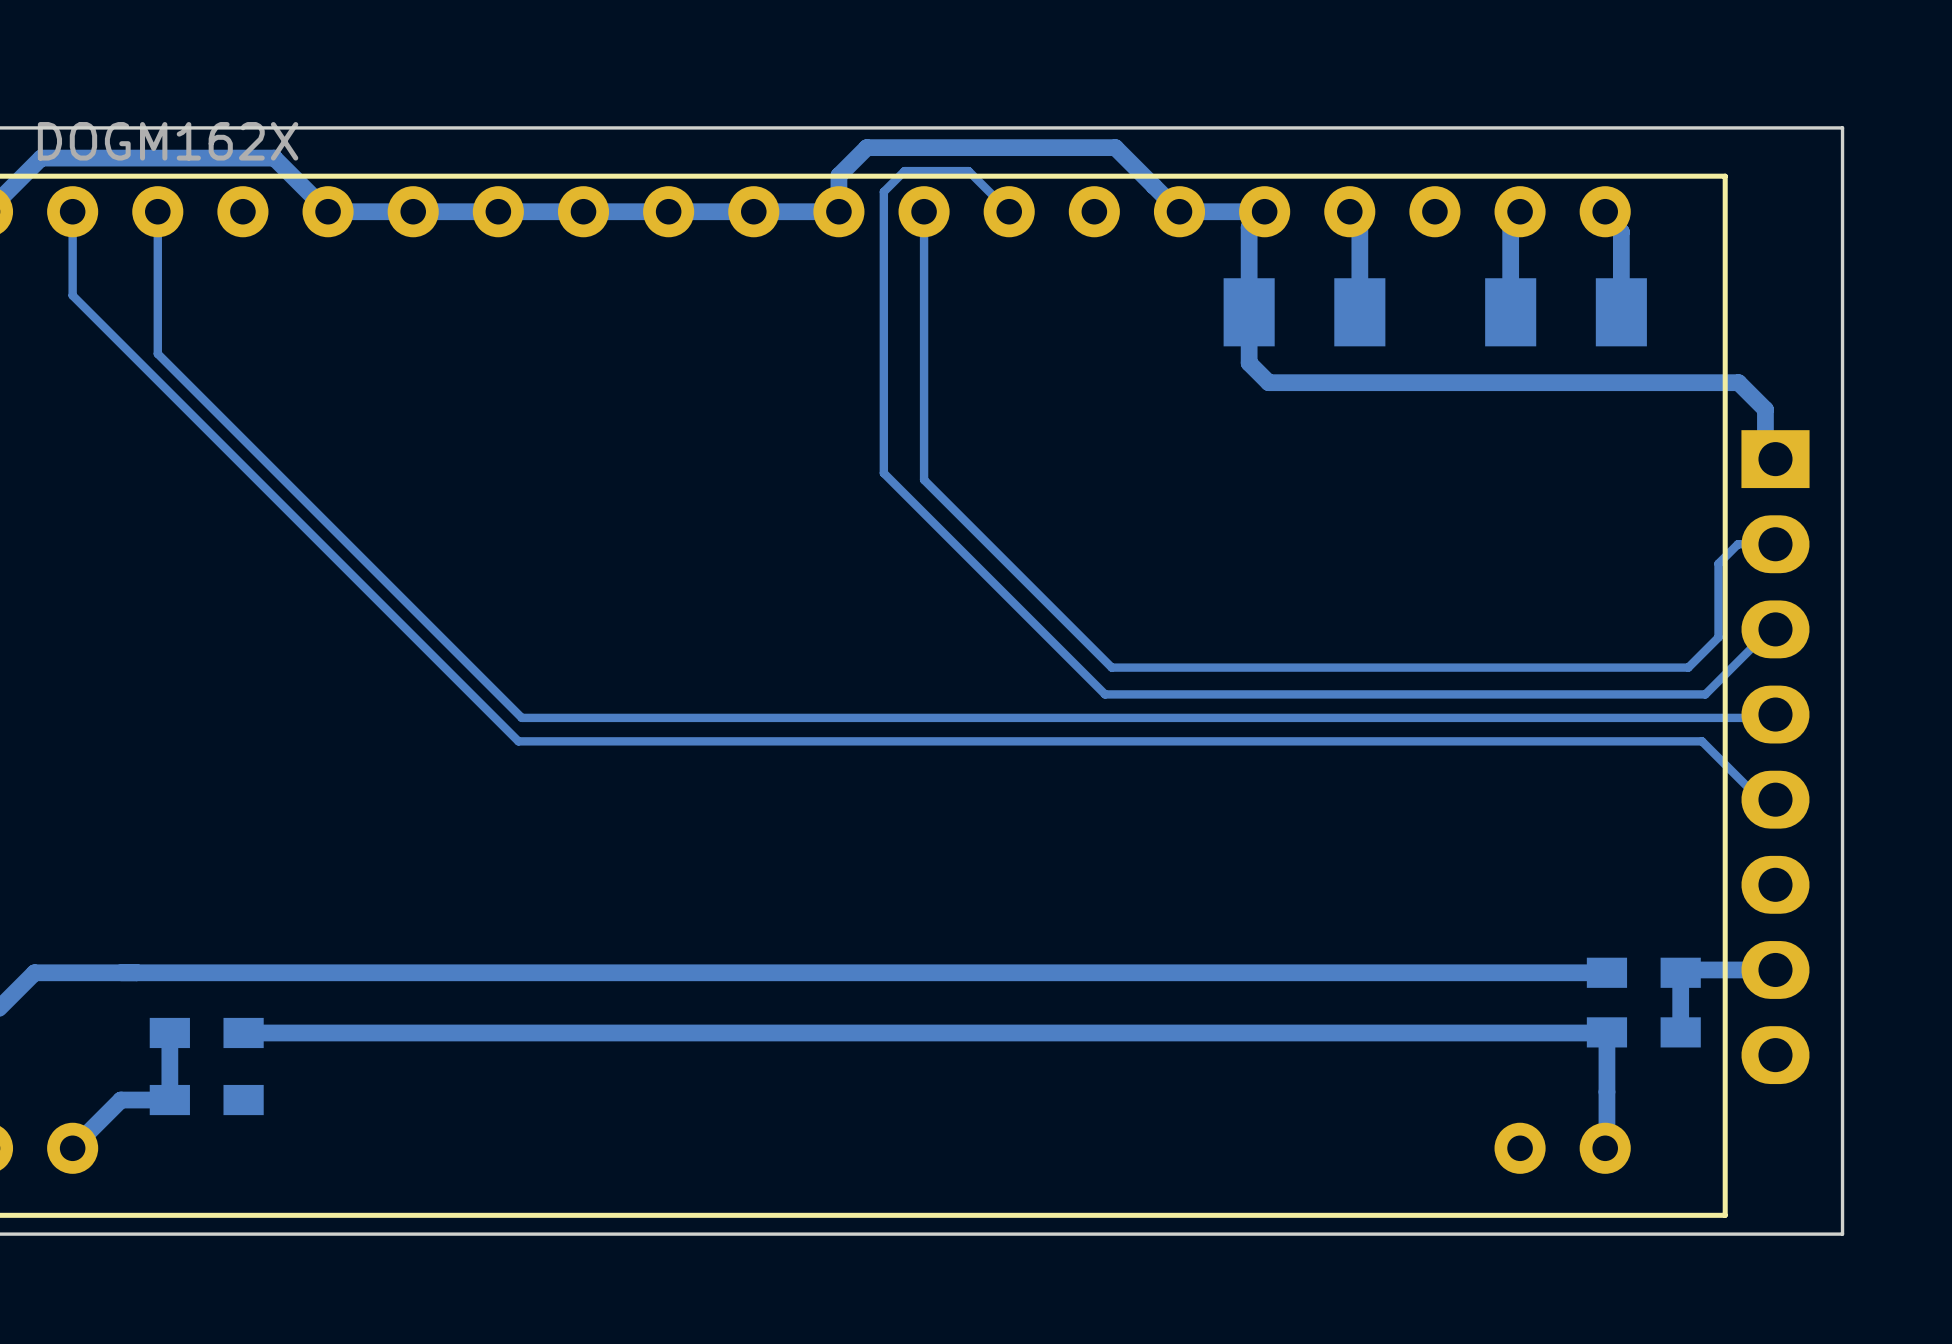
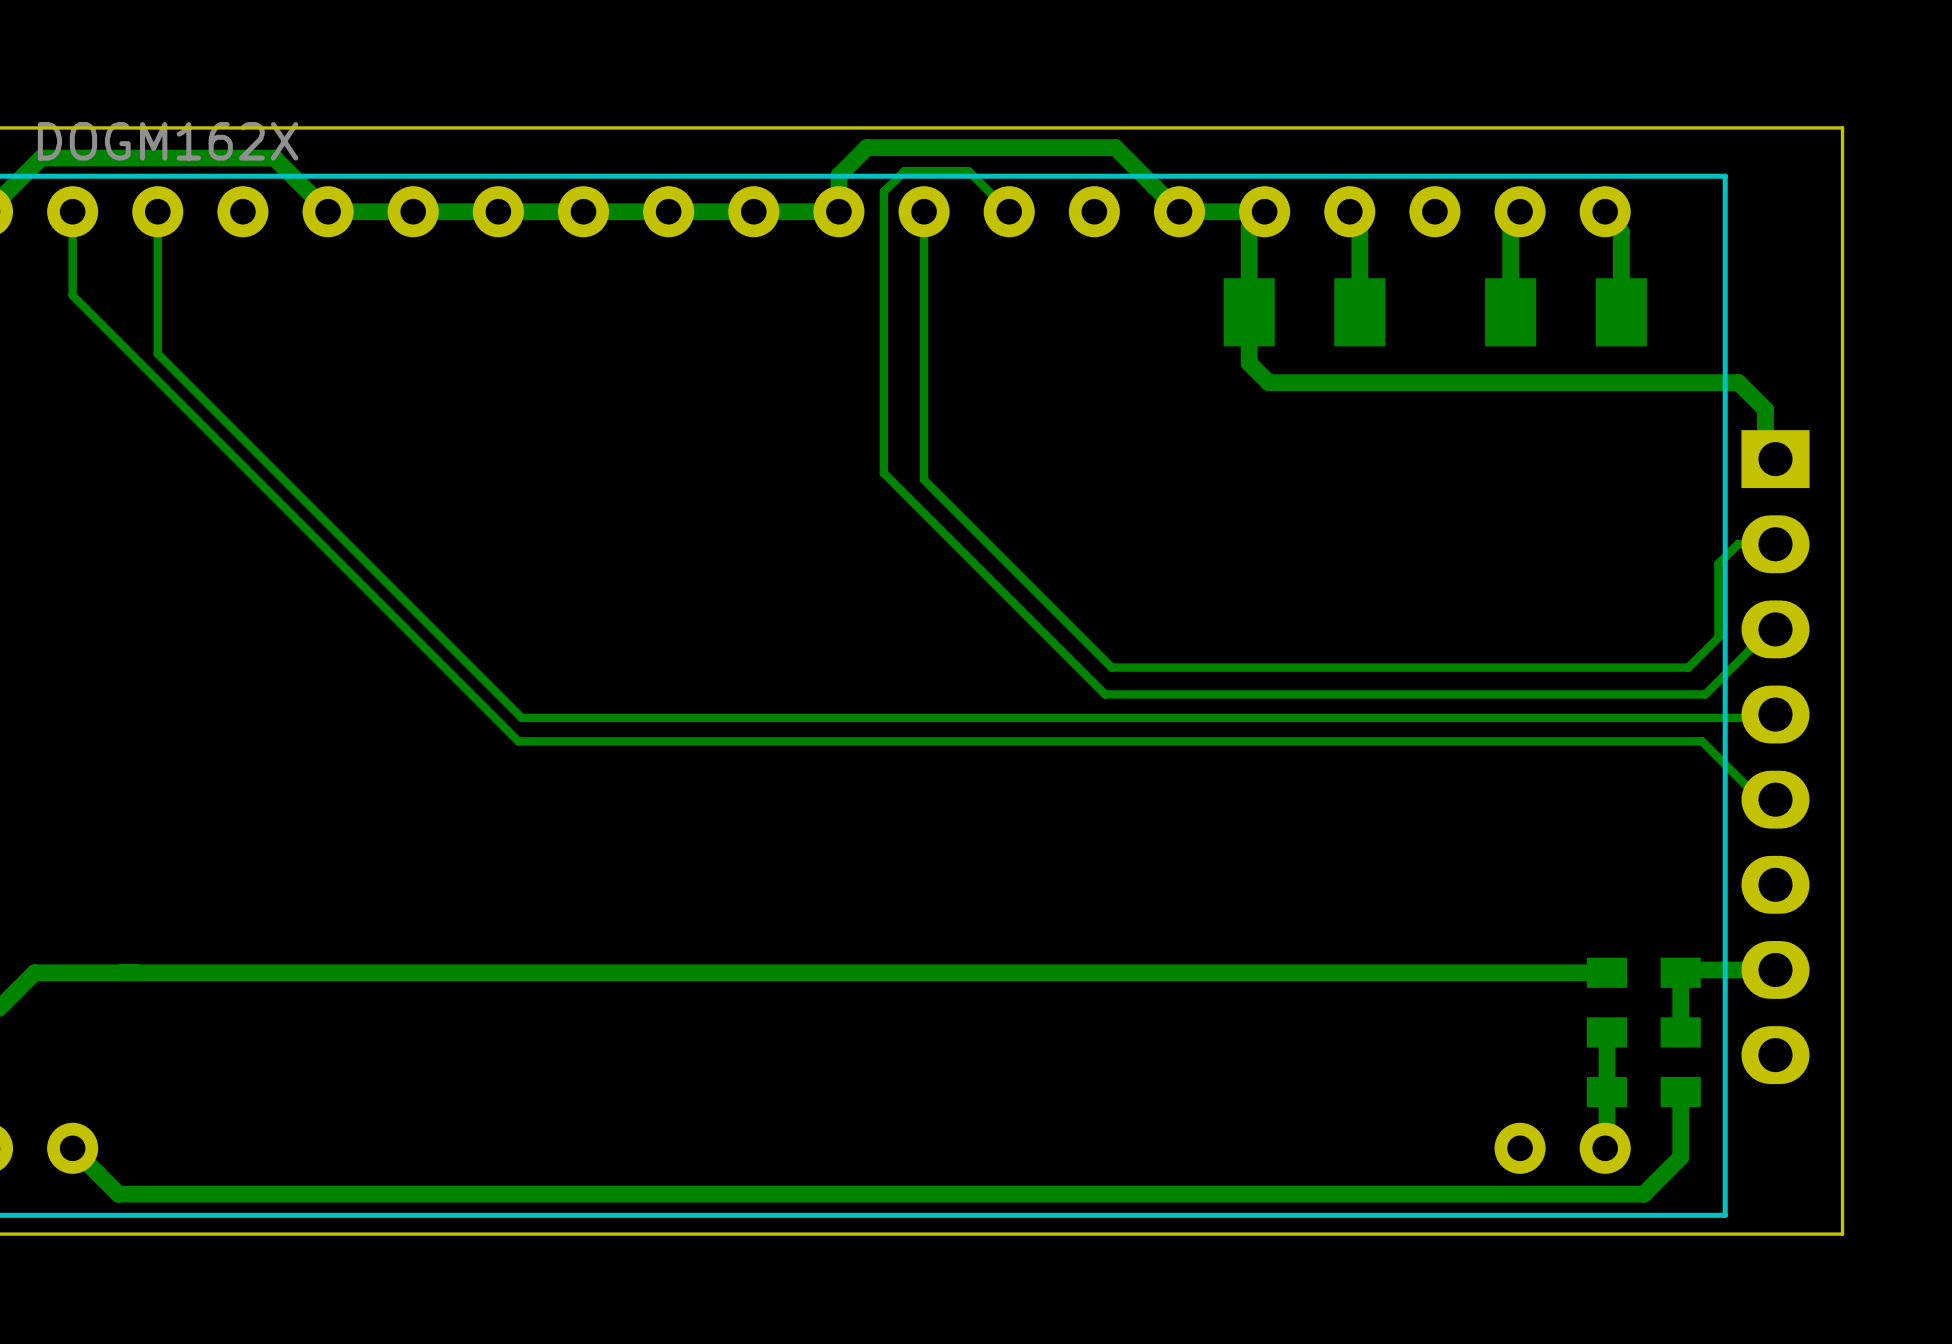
part: (206, 1032) -> none
bottom track: (1606, 1032) (250, 1032) (243, 1039) -> none
bottom track: (169, 1039) (169, 1100) (120, 1100) (72, 1148) -> (1680, 1091) (1680, 1157) (1643, 1194) (118, 1194) (72, 1148)
part: none -> (1643, 1091)
part: (206, 1100) -> none

